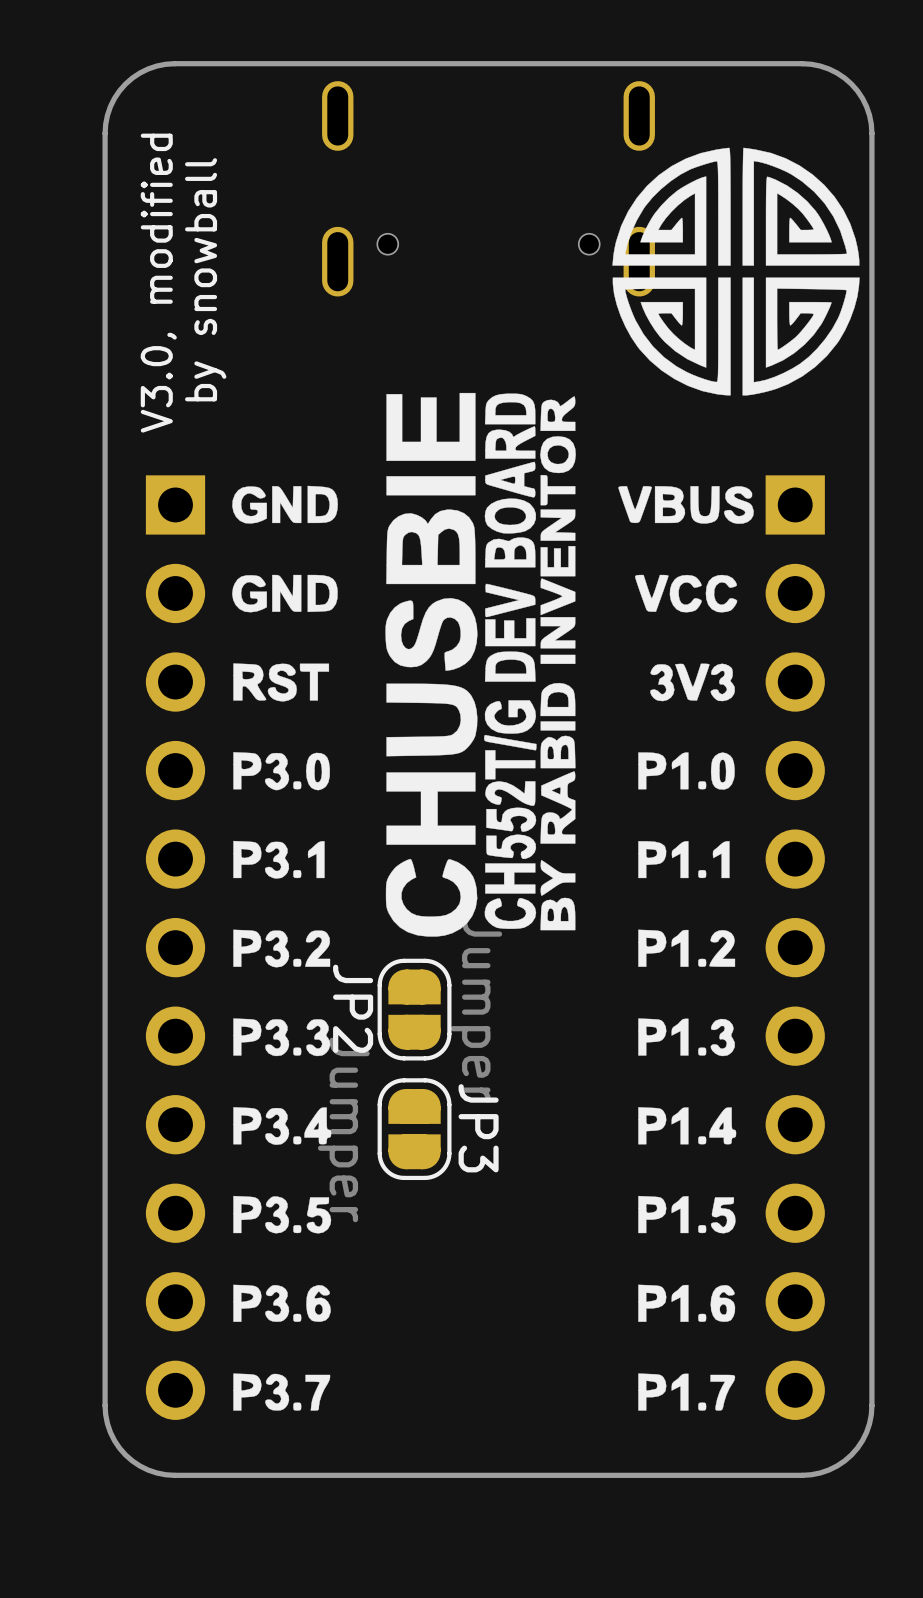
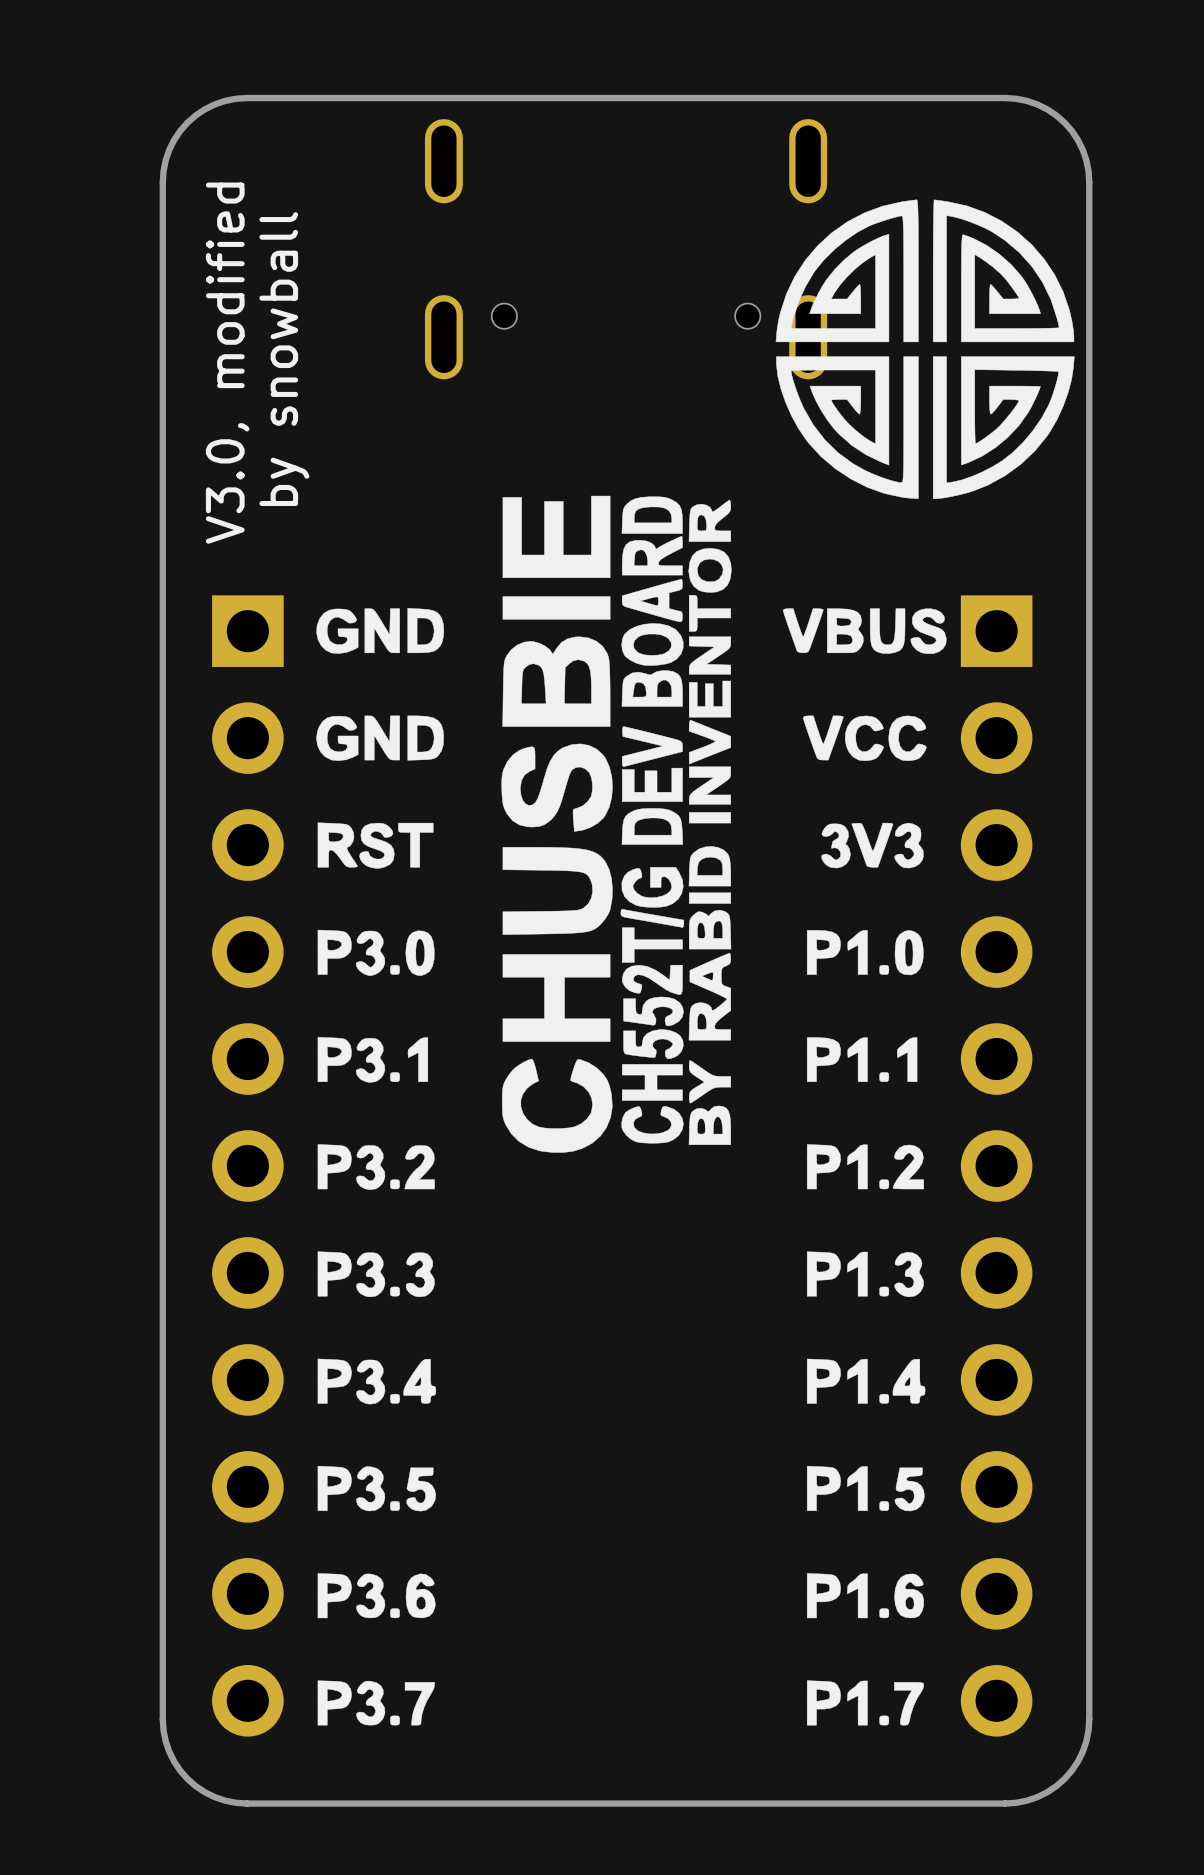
JP2: Jumper (414, 1009) -> none
JP3: Jumper (414, 1129) -> none

